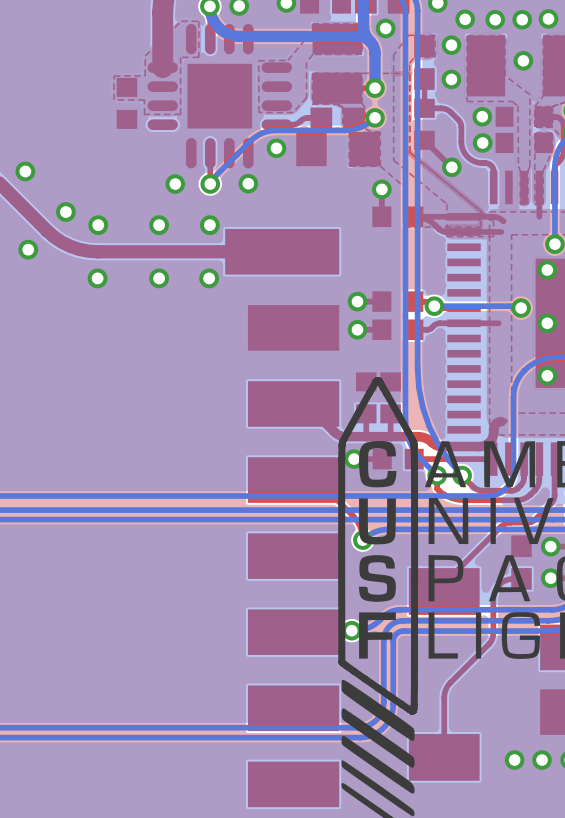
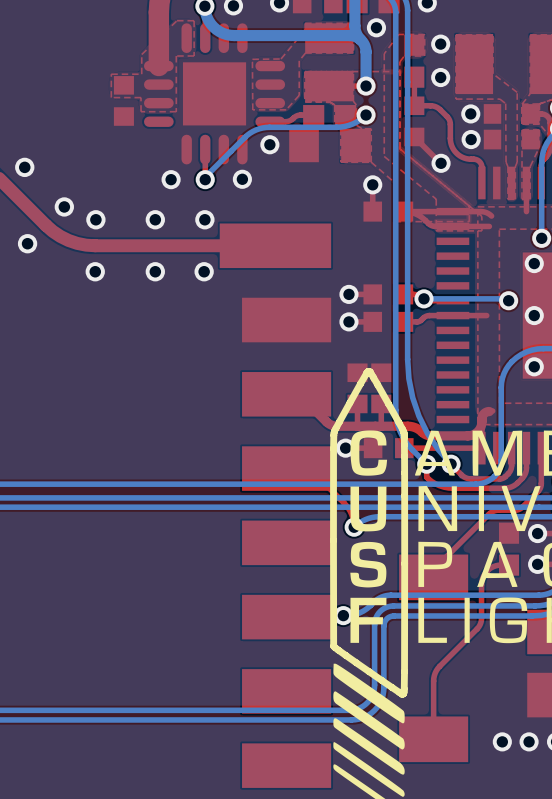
via: (548, 18) -> none
via: (465, 19) -> none
via: (495, 19) -> none
via: (522, 19) -> none
via: (523, 60) -> none

